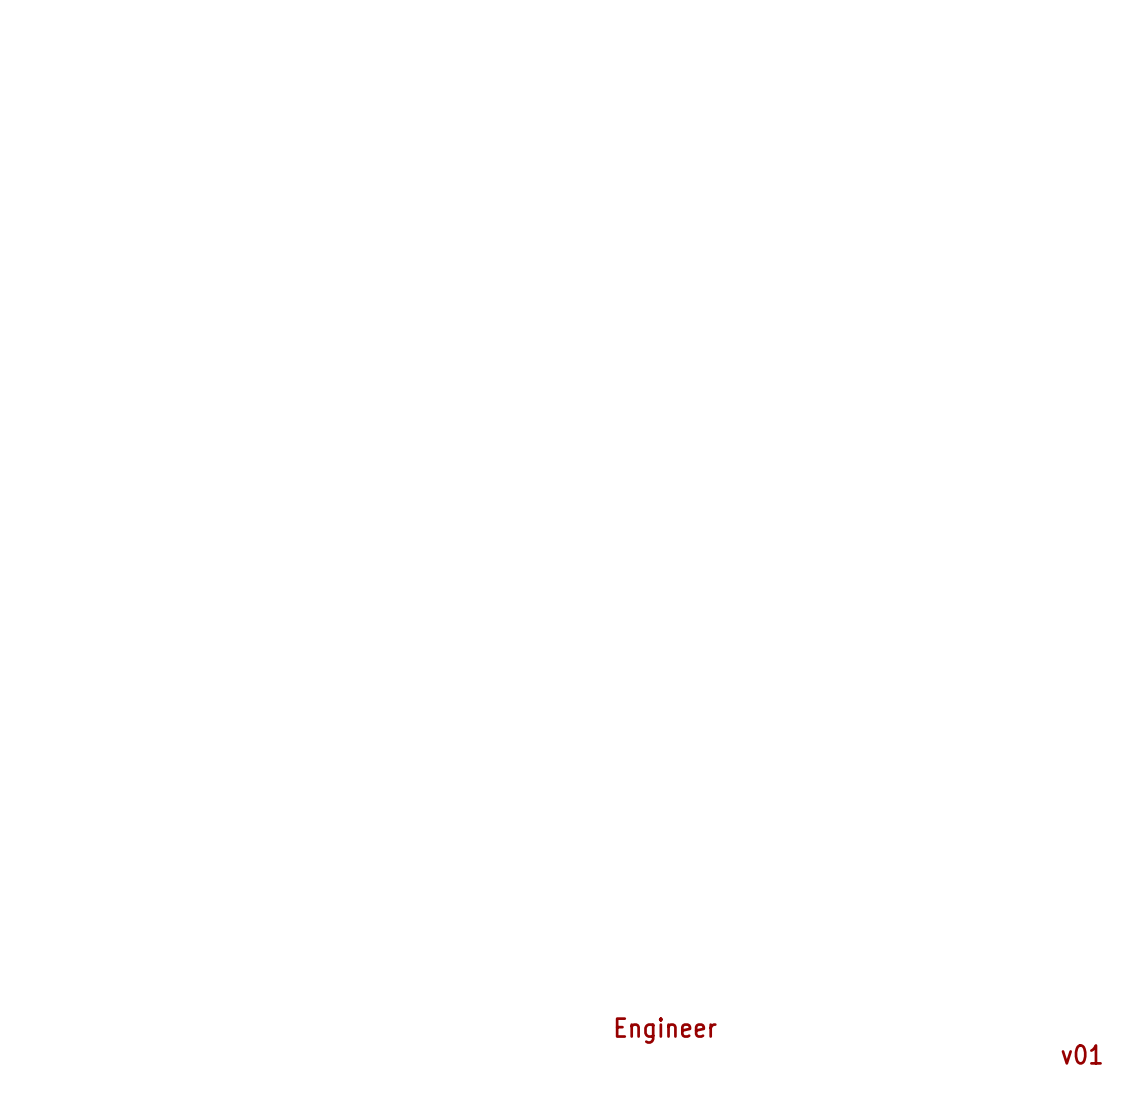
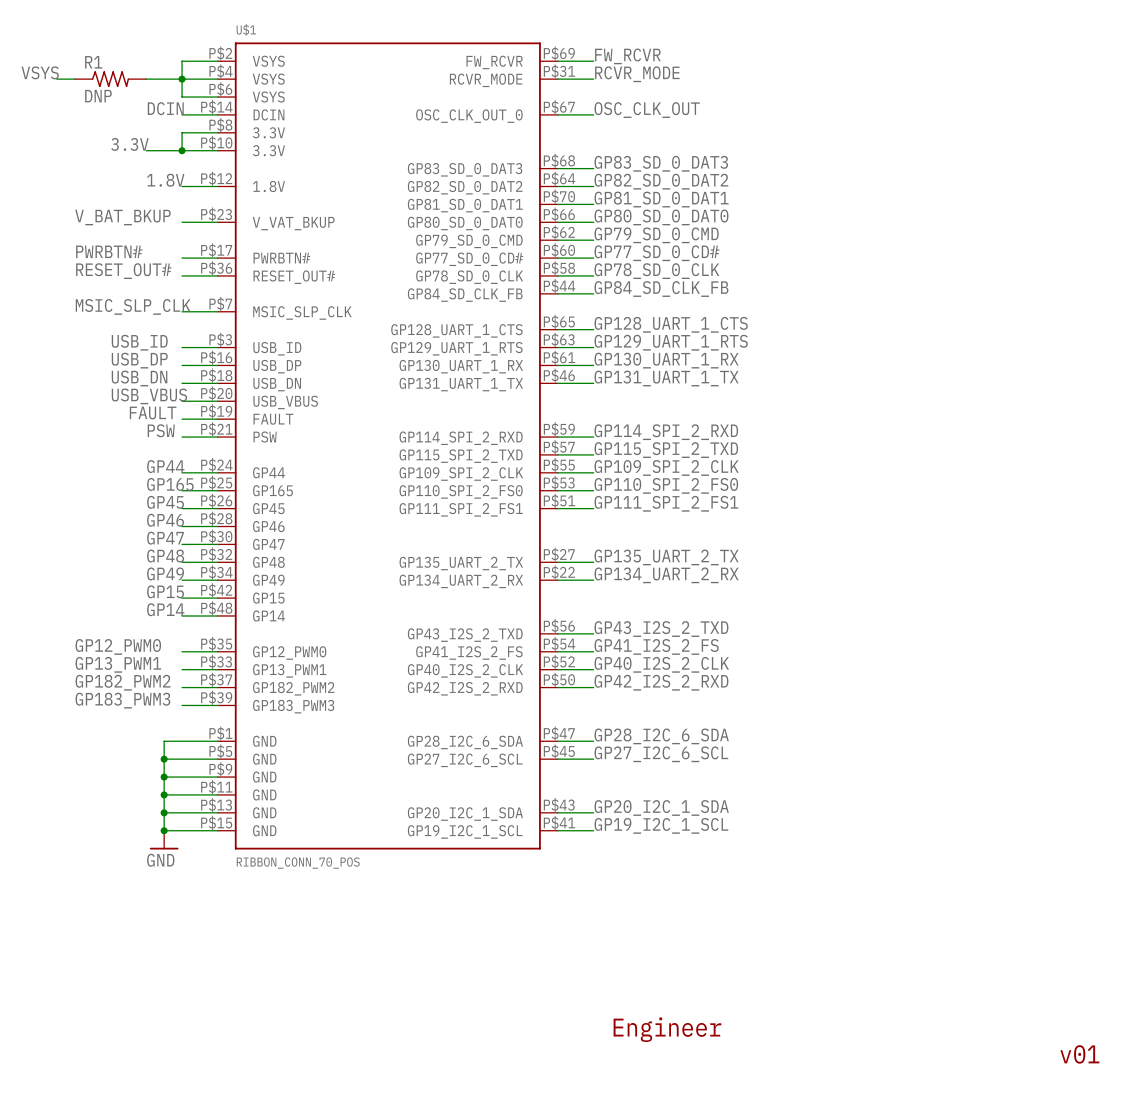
label: none -> FW_RCVR (627, 56)
wire: none -> (217, 61) (182, 61) (182, 97) (217, 97)
wire: none -> (557, 61) (593, 61)
label: none -> VSYS (40, 72)
label: none -> RCVR_MODE (637, 74)
wire: none -> (56, 79) (74, 79)
R1: none -> DNP (110, 79)
wire: none -> (146, 79) (217, 79)
junction: none -> (182, 79)
wire: none -> (557, 79) (593, 79)
label: none -> DCIN (165, 108)
label: none -> OSC_CLK_OUT (647, 110)
wire: none -> (182, 114) (217, 114)
wire: none -> (557, 114) (593, 114)
wire: none -> (217, 132) (182, 132) (182, 150)
label: none -> 3.3V (129, 144)
wire: none -> (146, 150) (217, 150)
junction: none -> (182, 150)
label: none -> GP83_SD_0_DAT3 (661, 163)
wire: none -> (557, 168) (593, 168)
label: none -> 1.8V (165, 180)
label: none -> GP82_SD_0_DAT2 (661, 181)
wire: none -> (182, 186) (217, 186)
wire: none -> (557, 186) (593, 186)
label: none -> GP81_SD_0_DAT1 (661, 199)
wire: none -> (557, 204) (593, 204)
label: none -> V_BAT_BKUP (122, 217)
label: none -> GP80_SD_0_DAT0 (661, 217)
wire: none -> (182, 222) (217, 222)
wire: none -> (557, 222) (593, 222)
label: none -> GP79_SD_0_CMD (656, 235)
wire: none -> (557, 240) (593, 240)
label: none -> PWRBTN# (109, 251)
label: none -> GP77_SD_0_CD# (656, 253)
wire: none -> (182, 258) (217, 258)
wire: none -> (557, 258) (593, 258)
label: none -> RESET_OUT# (123, 271)
label: none -> GP78_SD_0_CLK (656, 271)
wire: none -> (182, 275) (217, 275)
wire: none -> (557, 275) (593, 275)
label: none -> GP84_SD_CLK_FB (661, 289)
wire: none -> (557, 293) (593, 293)
label: none -> MSIC_SLP_CLK (133, 306)
wire: none -> (182, 311) (217, 311)
label: none -> GP128_UART_1_CTS (671, 324)
wire: none -> (557, 329) (593, 329)
label: none -> USB_ID (139, 342)
label: none -> GP129_UART_1_RTS (671, 342)
wire: none -> (182, 347) (217, 347)
wire: none -> (557, 347) (593, 347)
label: none -> USB_DP (139, 360)
label: none -> GP130_UART_1_RX (666, 360)
wire: none -> (182, 365) (217, 365)
wire: none -> (557, 365) (593, 365)
label: none -> USB_DN (139, 378)
label: none -> GP131_UART_1_TX (666, 378)
wire: none -> (182, 383) (217, 383)
wire: none -> (557, 383) (593, 383)
label: none -> USB_VBUS (149, 396)
wire: none -> (182, 401) (217, 401)
label: none -> FAULT (153, 412)
wire: none -> (182, 419) (217, 419)
label: none -> PSW (161, 430)
label: none -> GP114_SPI_2_RXD (666, 432)
wire: none -> (182, 437) (217, 437)
wire: none -> (557, 437) (593, 437)
U$1: none -> RIBBON_CONN_70_POS (387, 445)
label: none -> GP115_SPI_2_TXD (666, 450)
wire: none -> (557, 454) (593, 454)
label: none -> GP44 (165, 466)
label: none -> GP109_SPI_2_CLK (666, 467)
wire: none -> (182, 472) (217, 472)
wire: none -> (557, 472) (593, 472)
label: none -> GP165 (170, 484)
label: none -> GP110_SPI_2_FS0 (666, 485)
wire: none -> (182, 490) (217, 490)
wire: none -> (557, 490) (593, 490)
label: none -> GP45 (165, 502)
label: none -> GP111_SPI_2_FS1 (666, 503)
wire: none -> (182, 508) (217, 508)
wire: none -> (557, 508) (593, 508)
label: none -> GP46 (165, 520)
wire: none -> (182, 526) (217, 526)
label: none -> GP47 (165, 538)
wire: none -> (182, 544) (217, 544)
label: none -> GP48 (165, 556)
label: none -> GP135_UART_2_TX (666, 557)
wire: none -> (182, 562) (217, 562)
wire: none -> (557, 562) (593, 562)
label: none -> GP49 (165, 573)
label: none -> GP134_UART_2_RX (666, 575)
wire: none -> (182, 580) (217, 580)
wire: none -> (557, 580) (593, 580)
label: none -> GP15 (165, 591)
wire: none -> (182, 598) (217, 598)
label: none -> GP14 (165, 609)
wire: none -> (182, 615) (217, 615)
label: none -> GP43_I2S_2_TXD (661, 629)
wire: none -> (557, 633) (593, 633)
label: none -> GP41_I2S_2_FS (656, 646)
label: none -> GP12_PWM0 (118, 646)
wire: none -> (182, 651) (217, 651)
wire: none -> (557, 651) (593, 651)
label: none -> GP40_I2S_2_CLK (661, 664)
label: none -> GP13_PWM1 (118, 664)
wire: none -> (182, 669) (217, 669)
wire: none -> (557, 669) (593, 669)
label: none -> GP182_PWM2 (123, 682)
label: none -> GP42_I2S_2_RXD (661, 682)
wire: none -> (182, 687) (217, 687)
wire: none -> (557, 687) (593, 687)
label: none -> GP183_PWM3 (122, 700)
wire: none -> (182, 705) (217, 705)
label: none -> GP28_I2C_6_SDA (661, 736)
wire: none -> (217, 741) (164, 741) (164, 830) (217, 830)
wire: none -> (557, 741) (593, 741)
label: none -> GP27_I2C_6_SCL (661, 754)
wire: none -> (164, 759) (217, 759)
junction: none -> (164, 759)
wire: none -> (557, 759) (593, 759)
wire: none -> (164, 777) (217, 777)
junction: none -> (164, 777)
wire: none -> (164, 794) (217, 794)
junction: none -> (164, 794)
label: none -> GP20_I2C_1_SDA (661, 807)
wire: none -> (164, 812) (217, 812)
junction: none -> (164, 812)
wire: none -> (557, 812) (593, 812)
label: none -> GP19_I2C_1_SCL (661, 825)
junction: none -> (164, 830)
wire: none -> (557, 830) (593, 830)
power symbol: none -> GND (164, 840)

